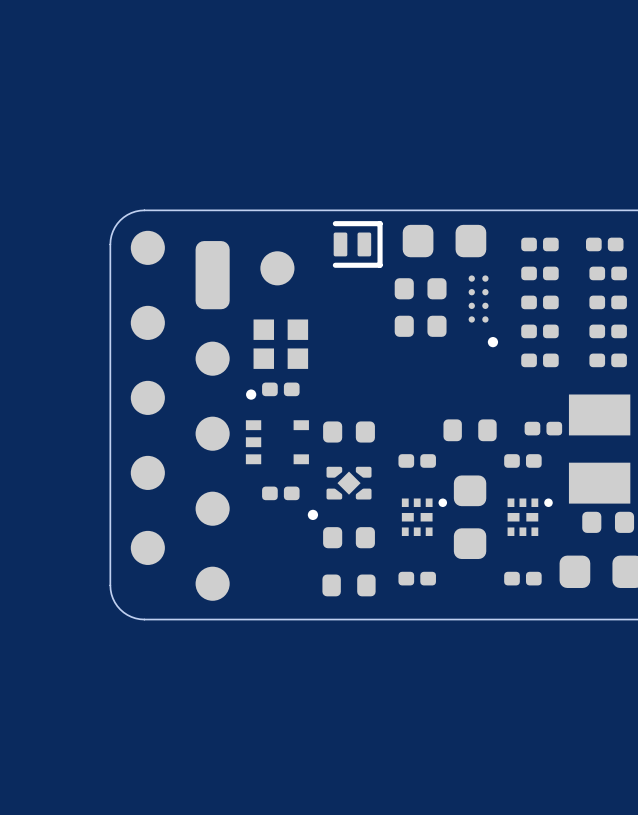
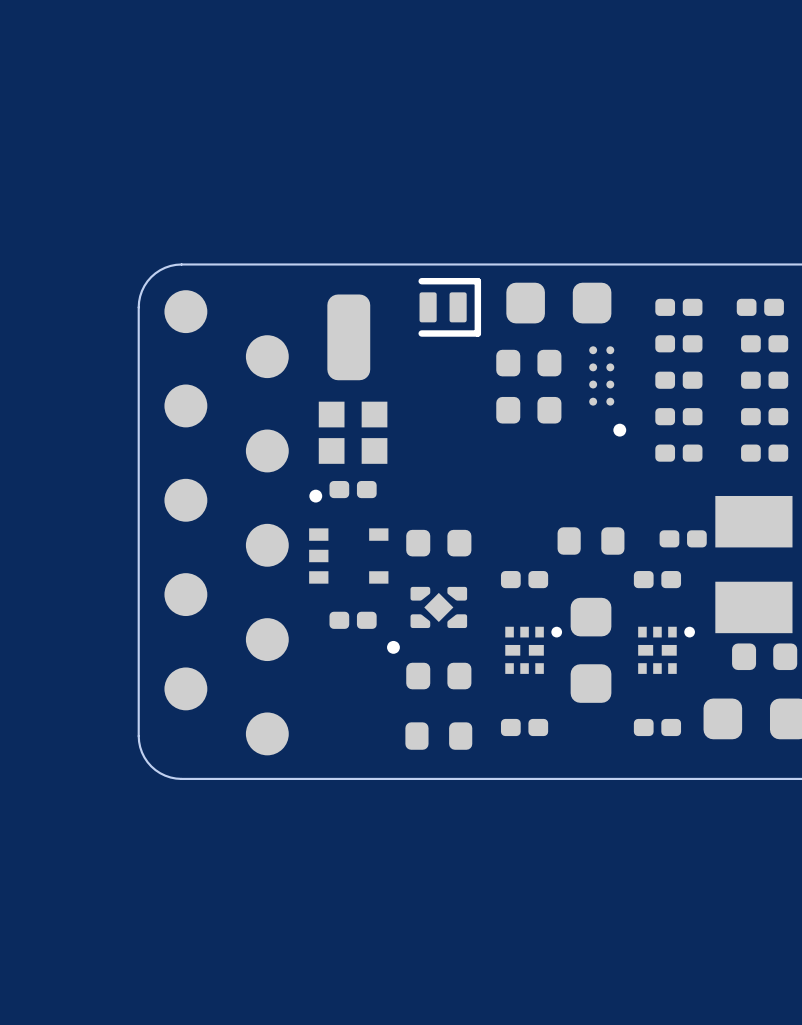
part footprint: [195, 241, 230, 310] -> [245, 335, 289, 379]
part footprint: [260, 251, 295, 286] -> [327, 294, 371, 381]

